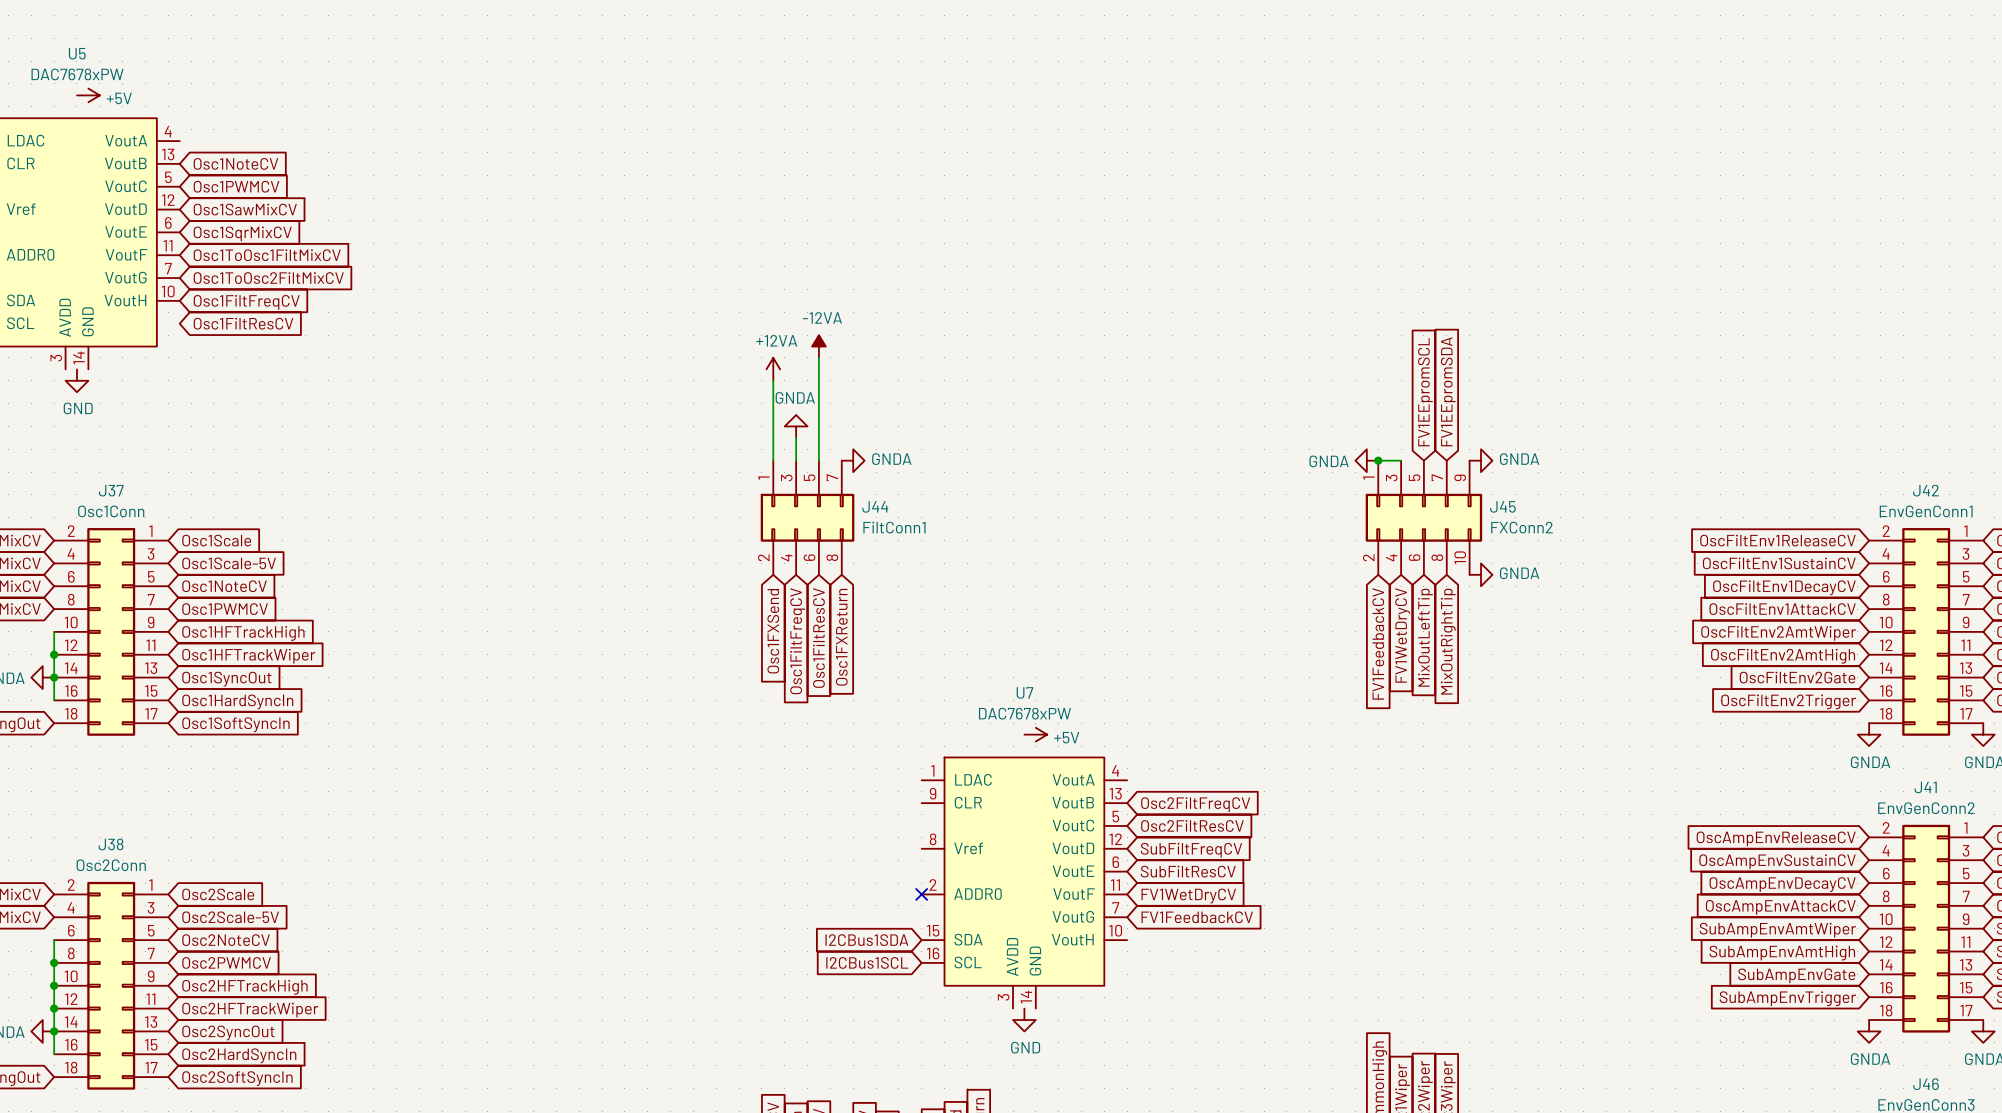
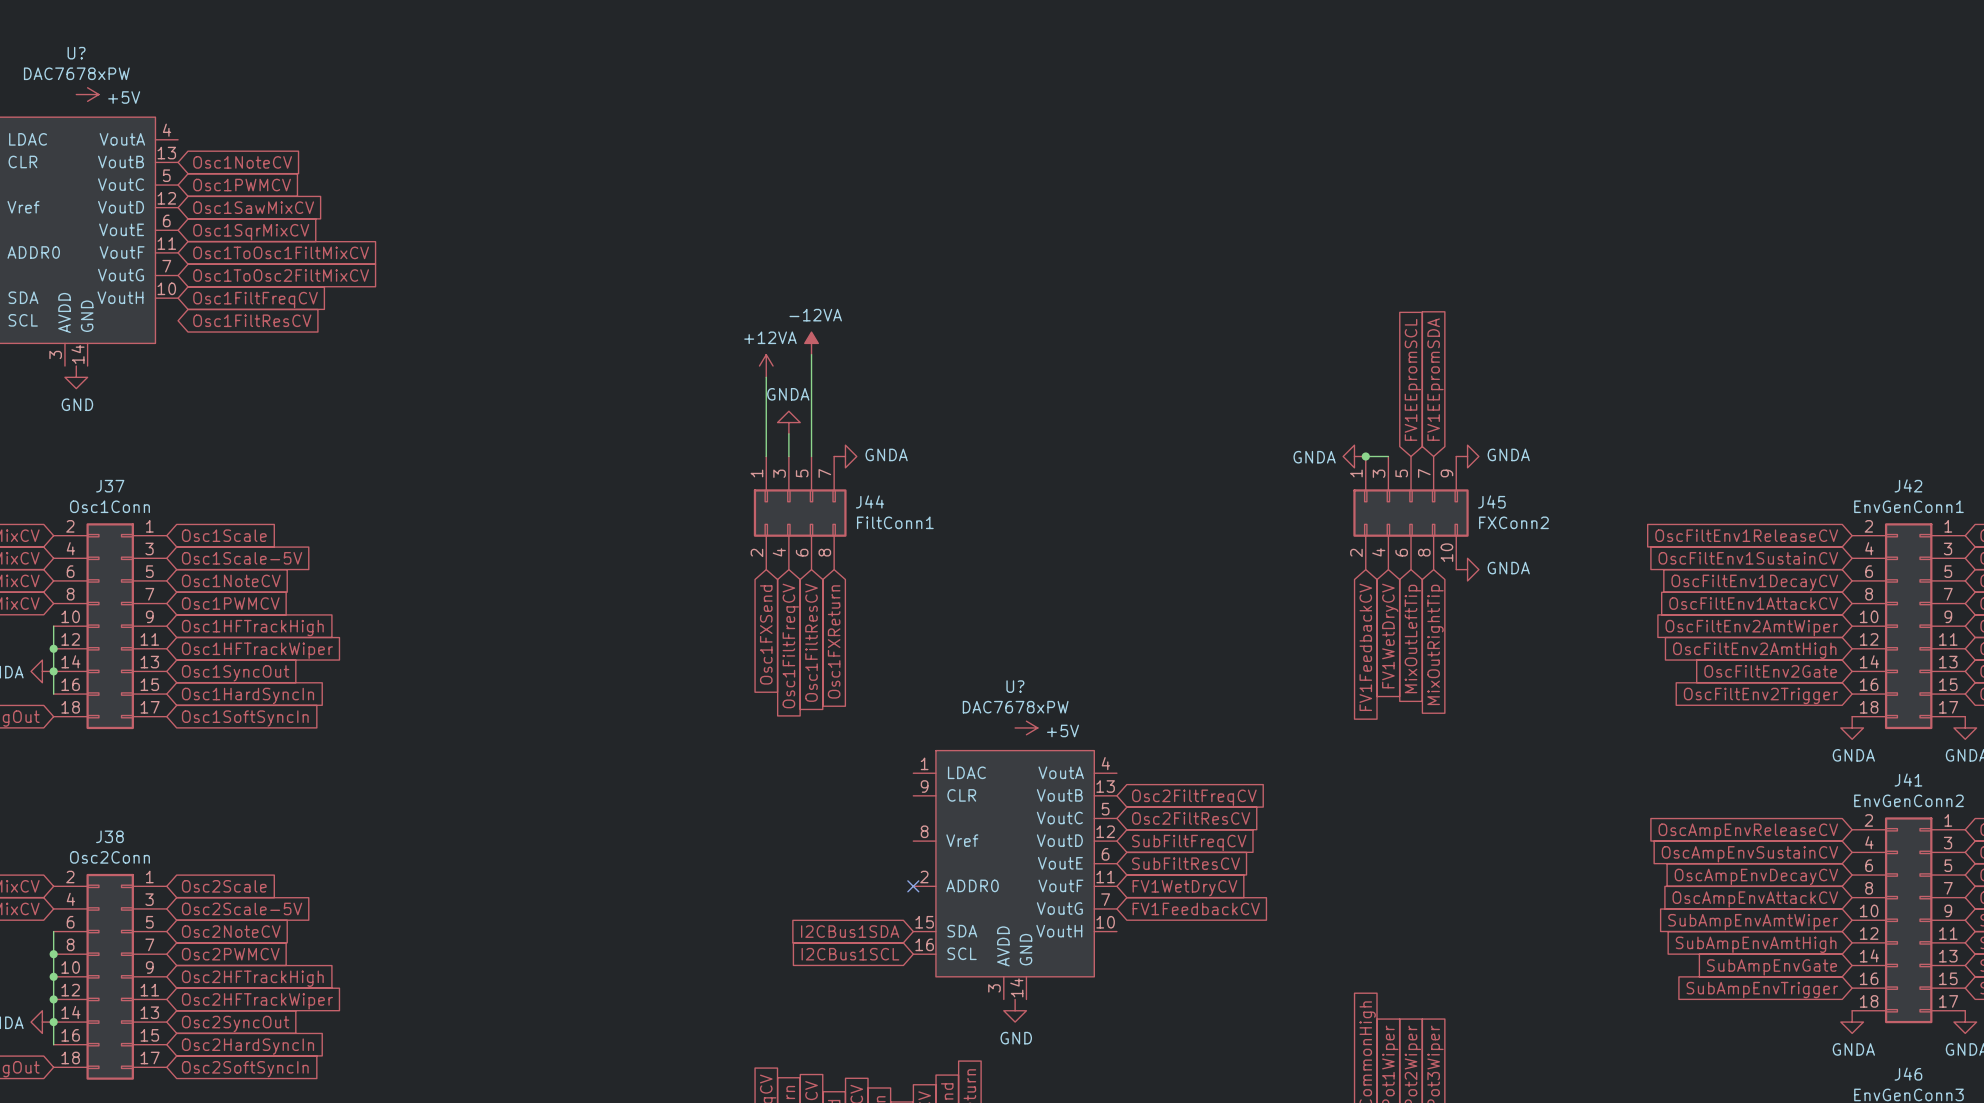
U5 name: U5 (77, 53) -> U? (76, 53)
U7 name: U7 (1024, 692) -> U? (1015, 686)

